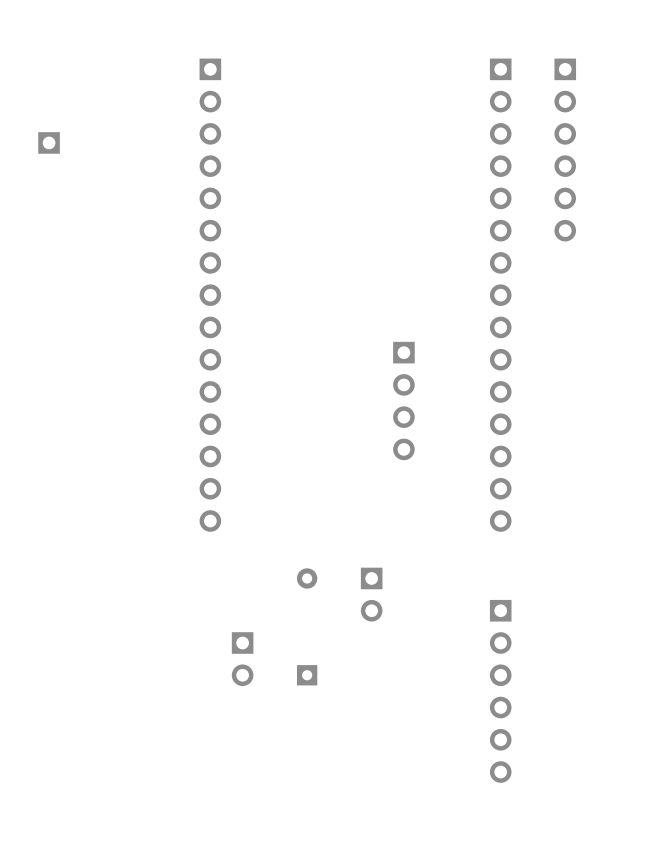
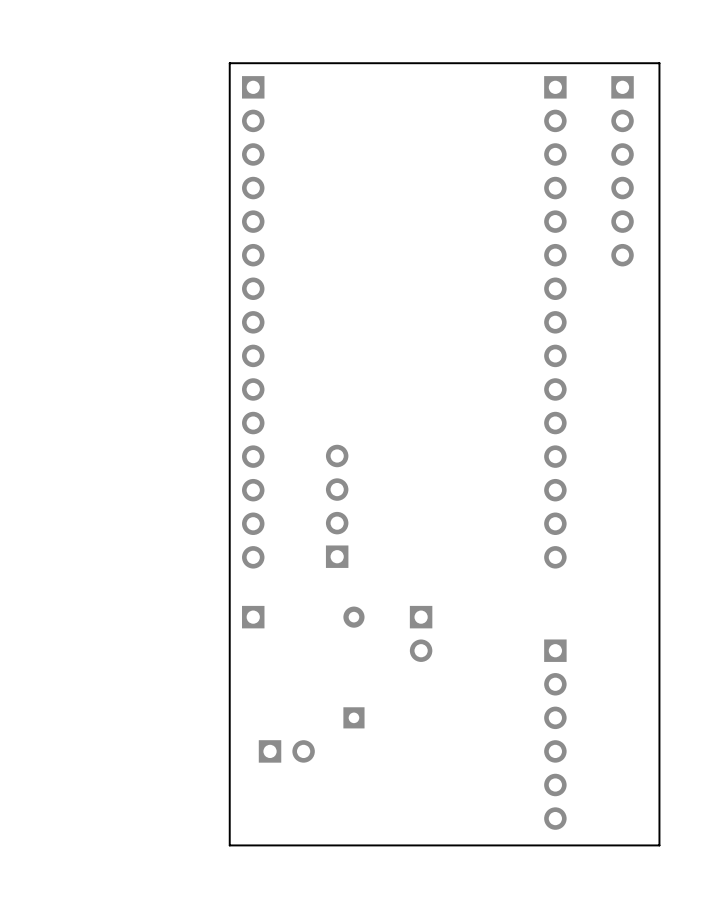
board edge: none -> (659, 63) (229, 63) (229, 845) (659, 845) (659, 63)
part: (49, 142) -> none
part rotation: 0° (403, 401) -> 180° (337, 506)
part position: (403, 401) -> (337, 506)
part: none -> (253, 617)
part rotation: 0° (242, 659) -> 90° counterclockwise (286, 751)
part position: (242, 659) -> (286, 751)

